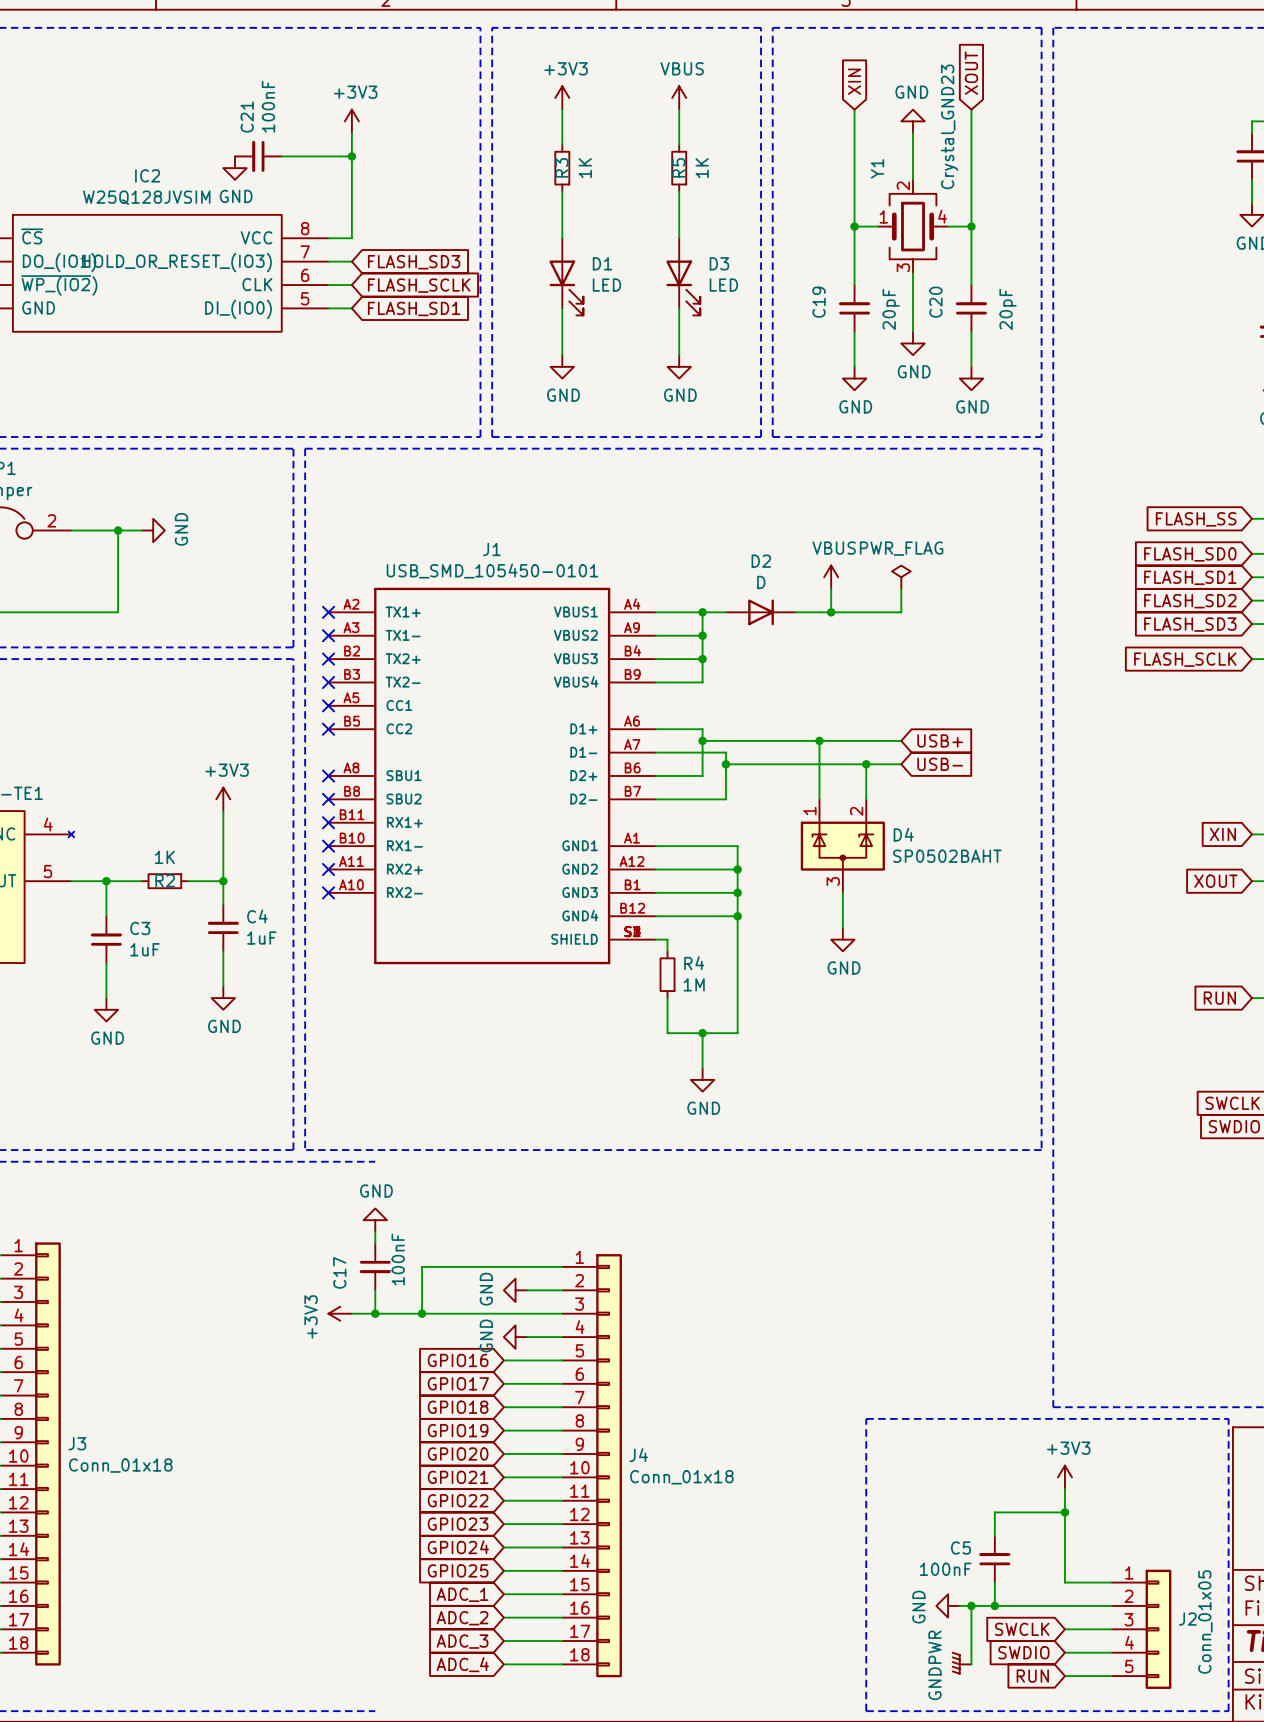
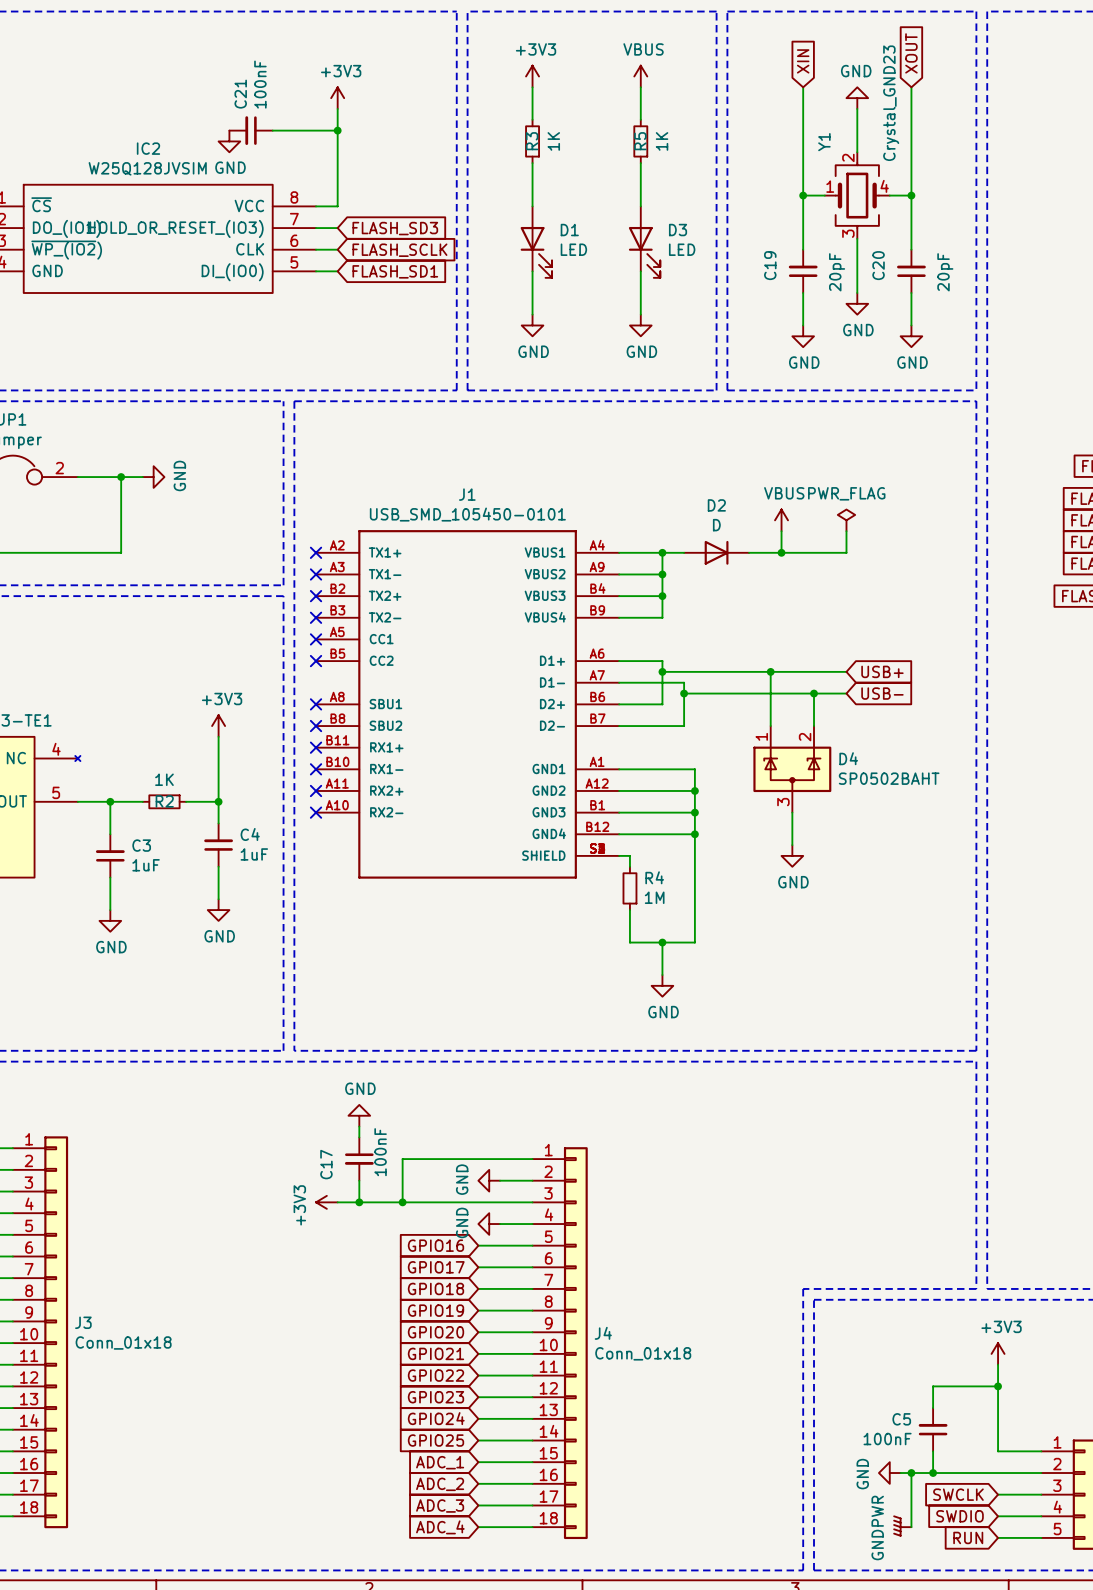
line: none -> (359, 1061) (976, 1061) (976, 1288) (803, 1288) (803, 1570) (359, 1570)

